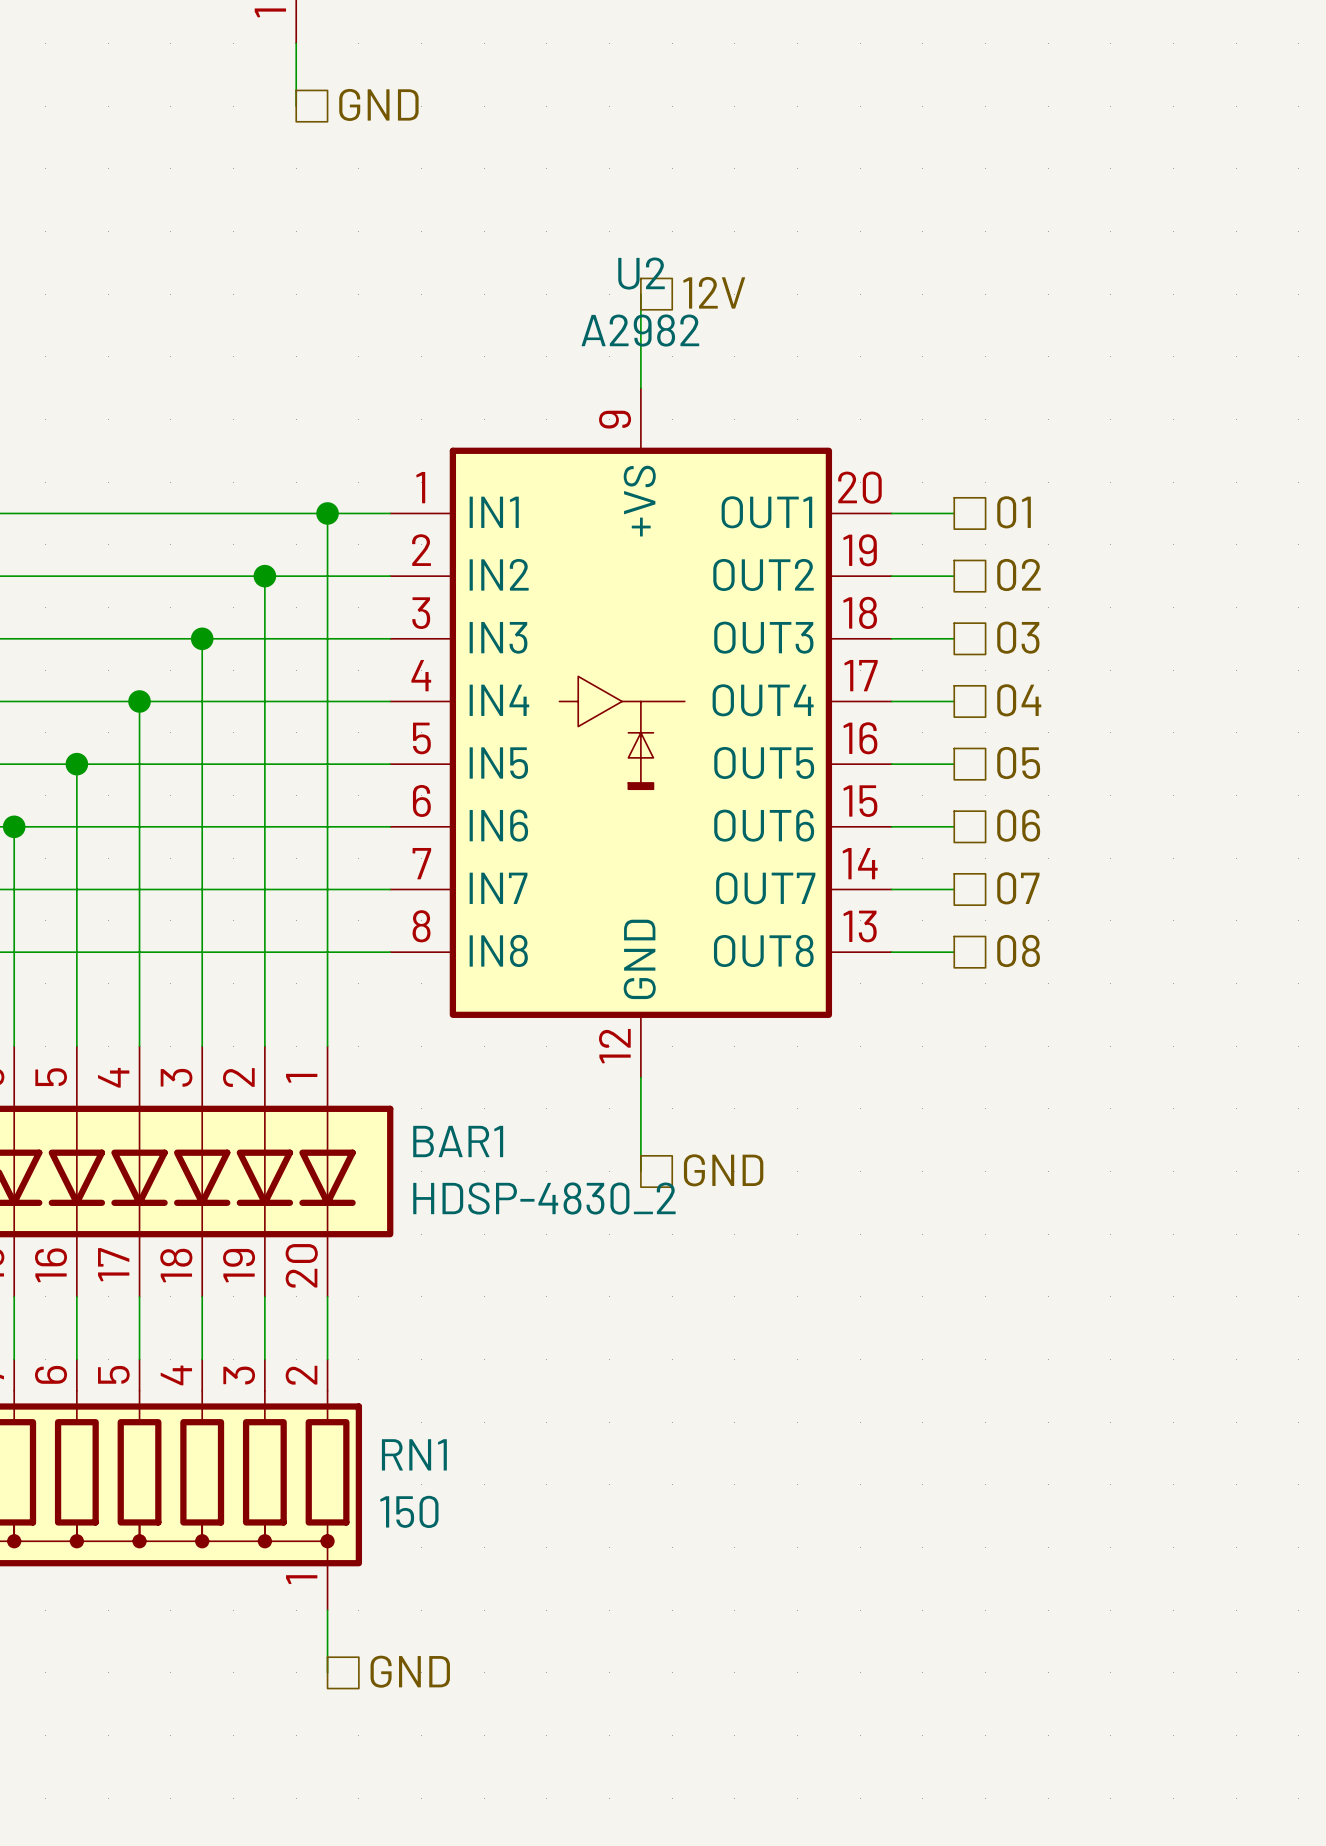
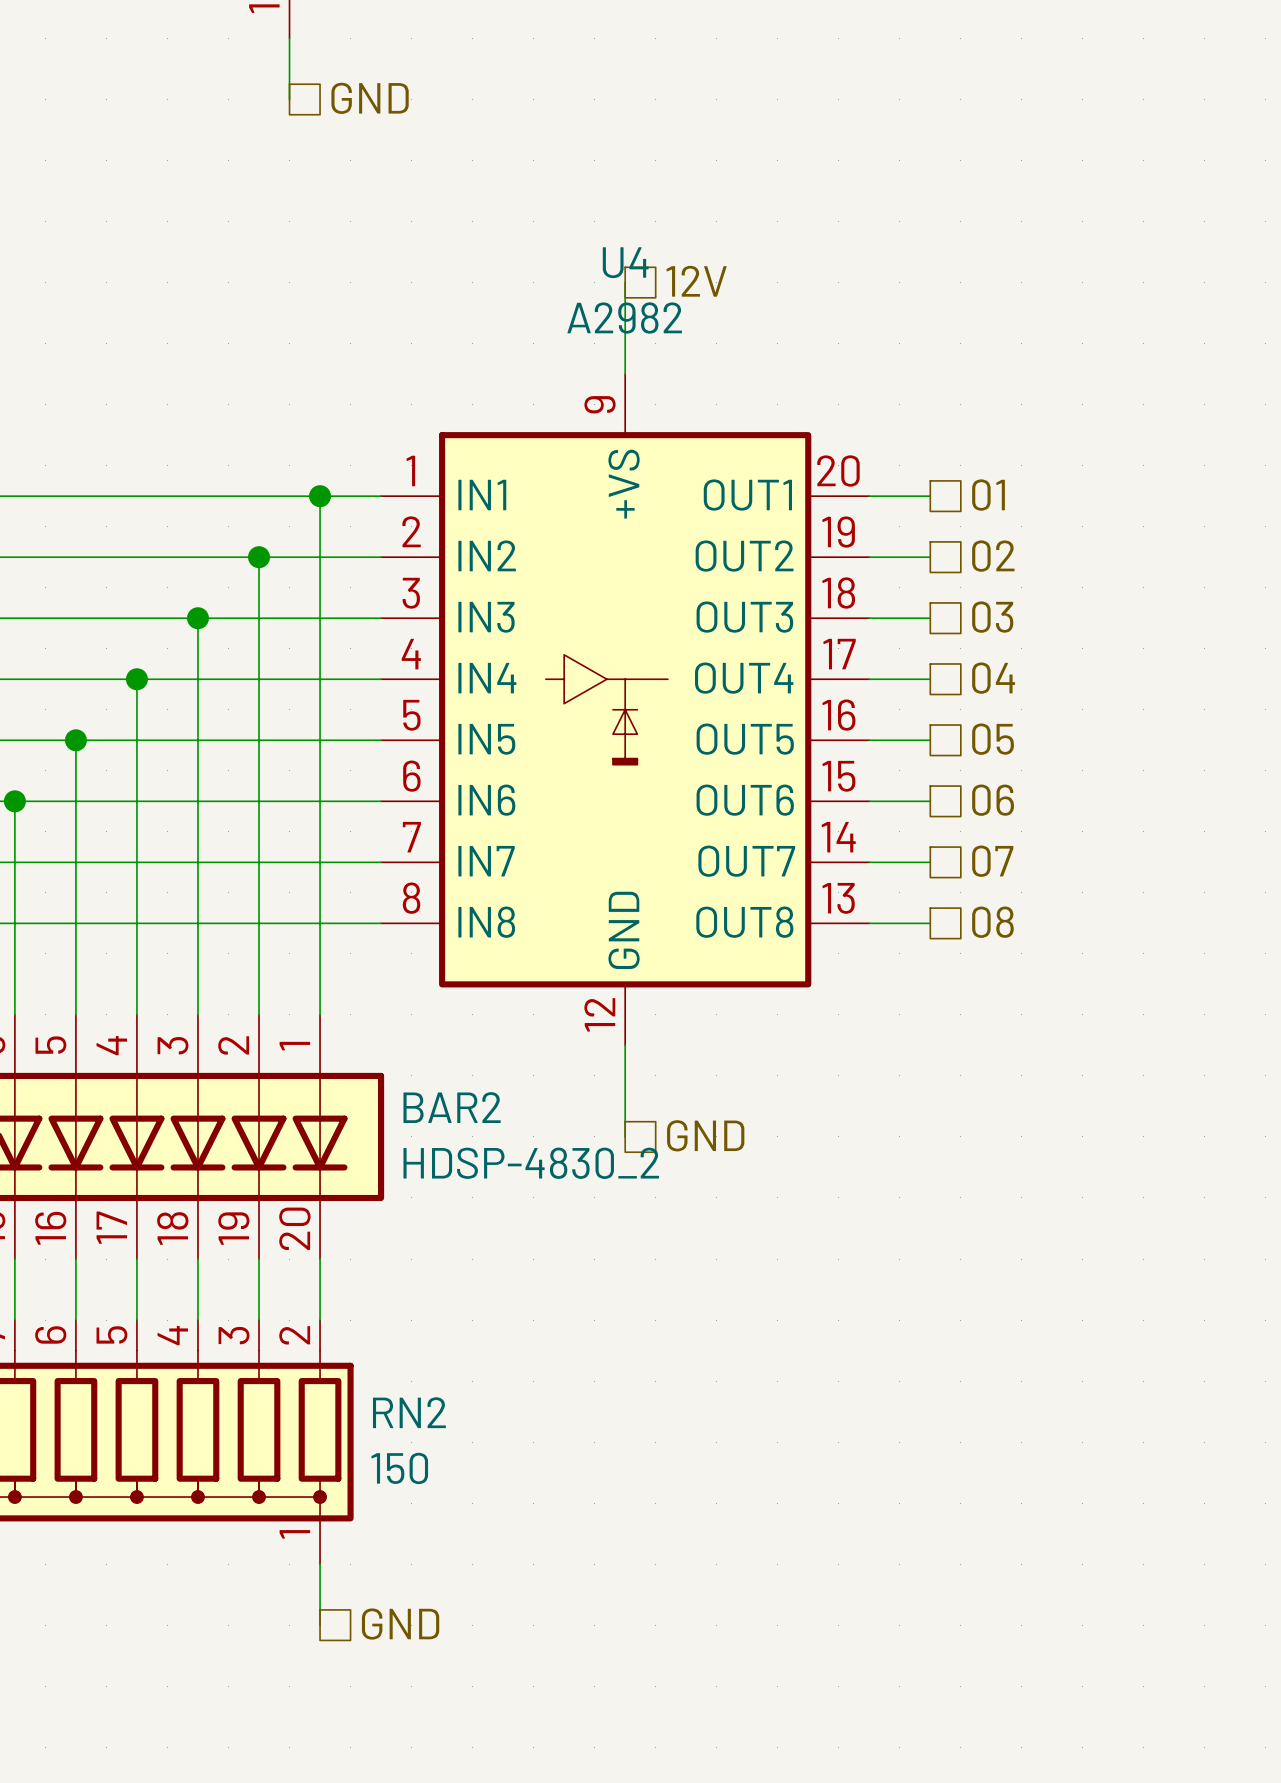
U2 name: U2 (641, 273) -> U4 (625, 262)
BAR1 name: BAR1 (458, 1141) -> BAR2 (452, 1107)
RN1 name: RN1 (414, 1454) -> RN2 (409, 1412)

